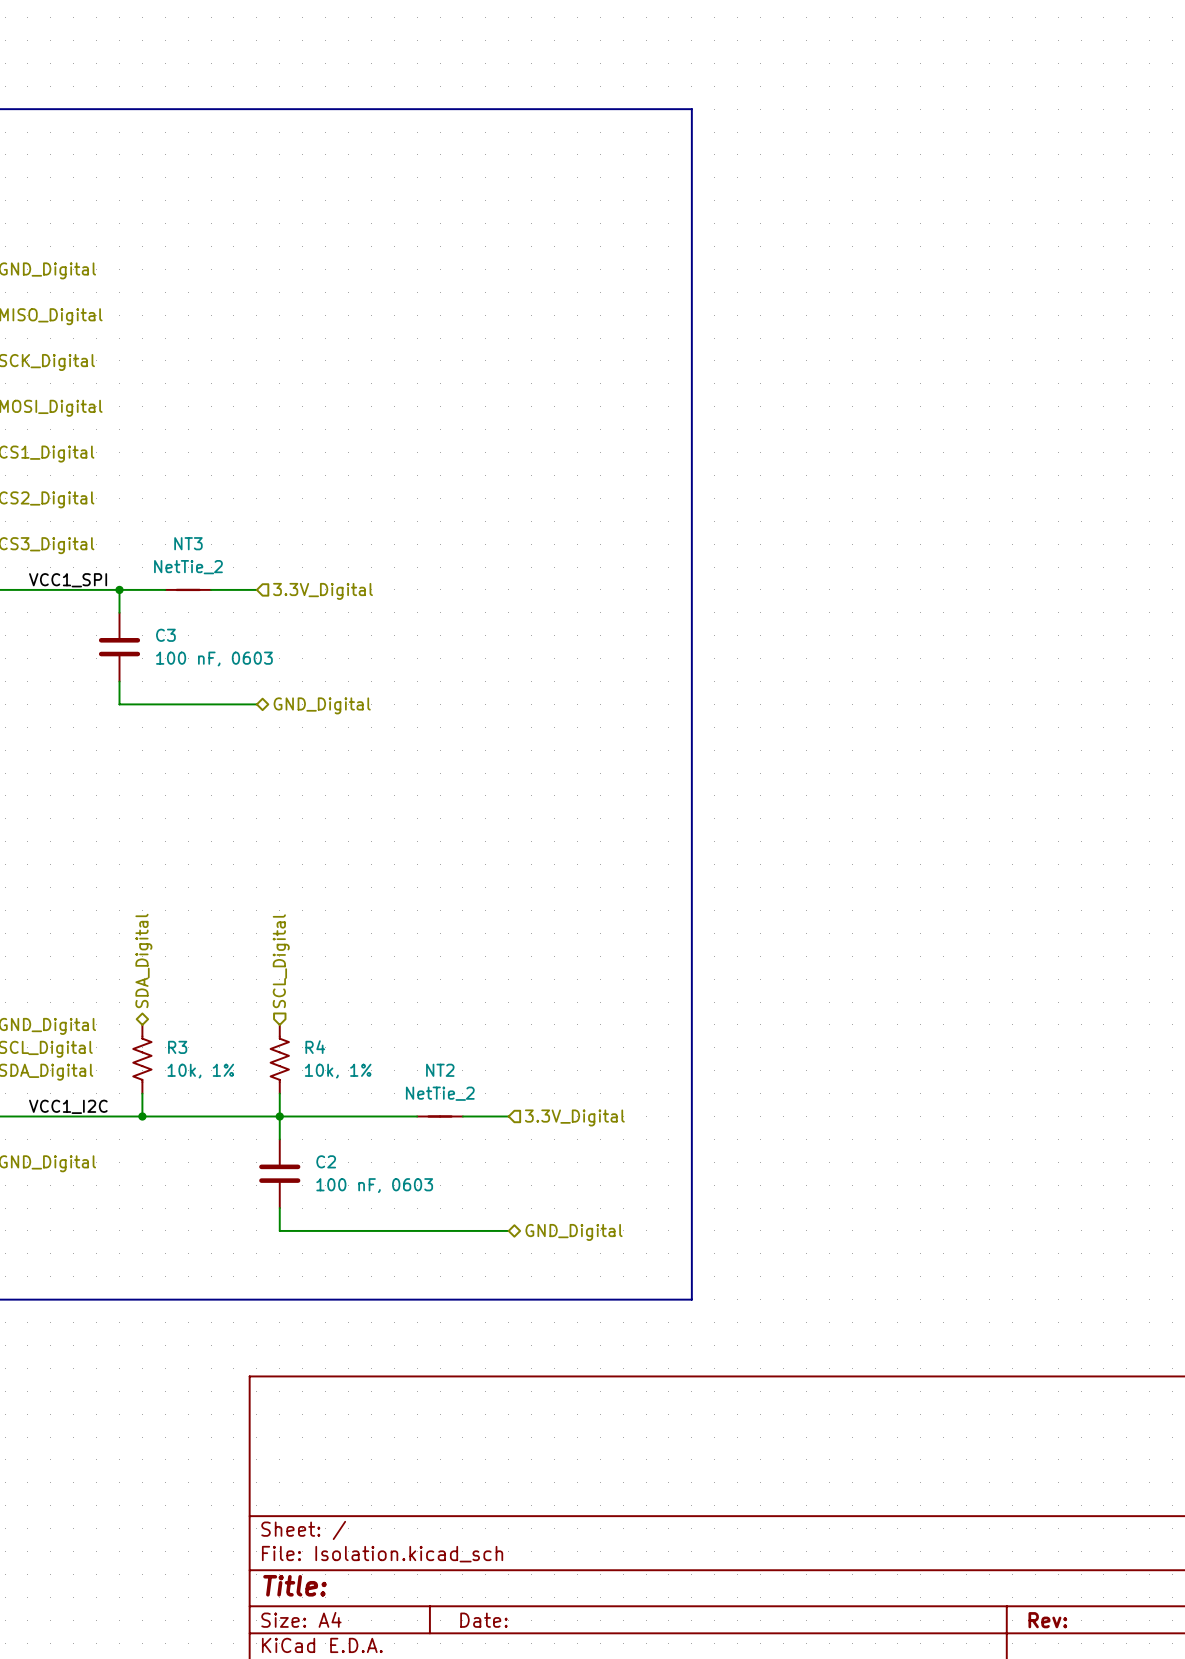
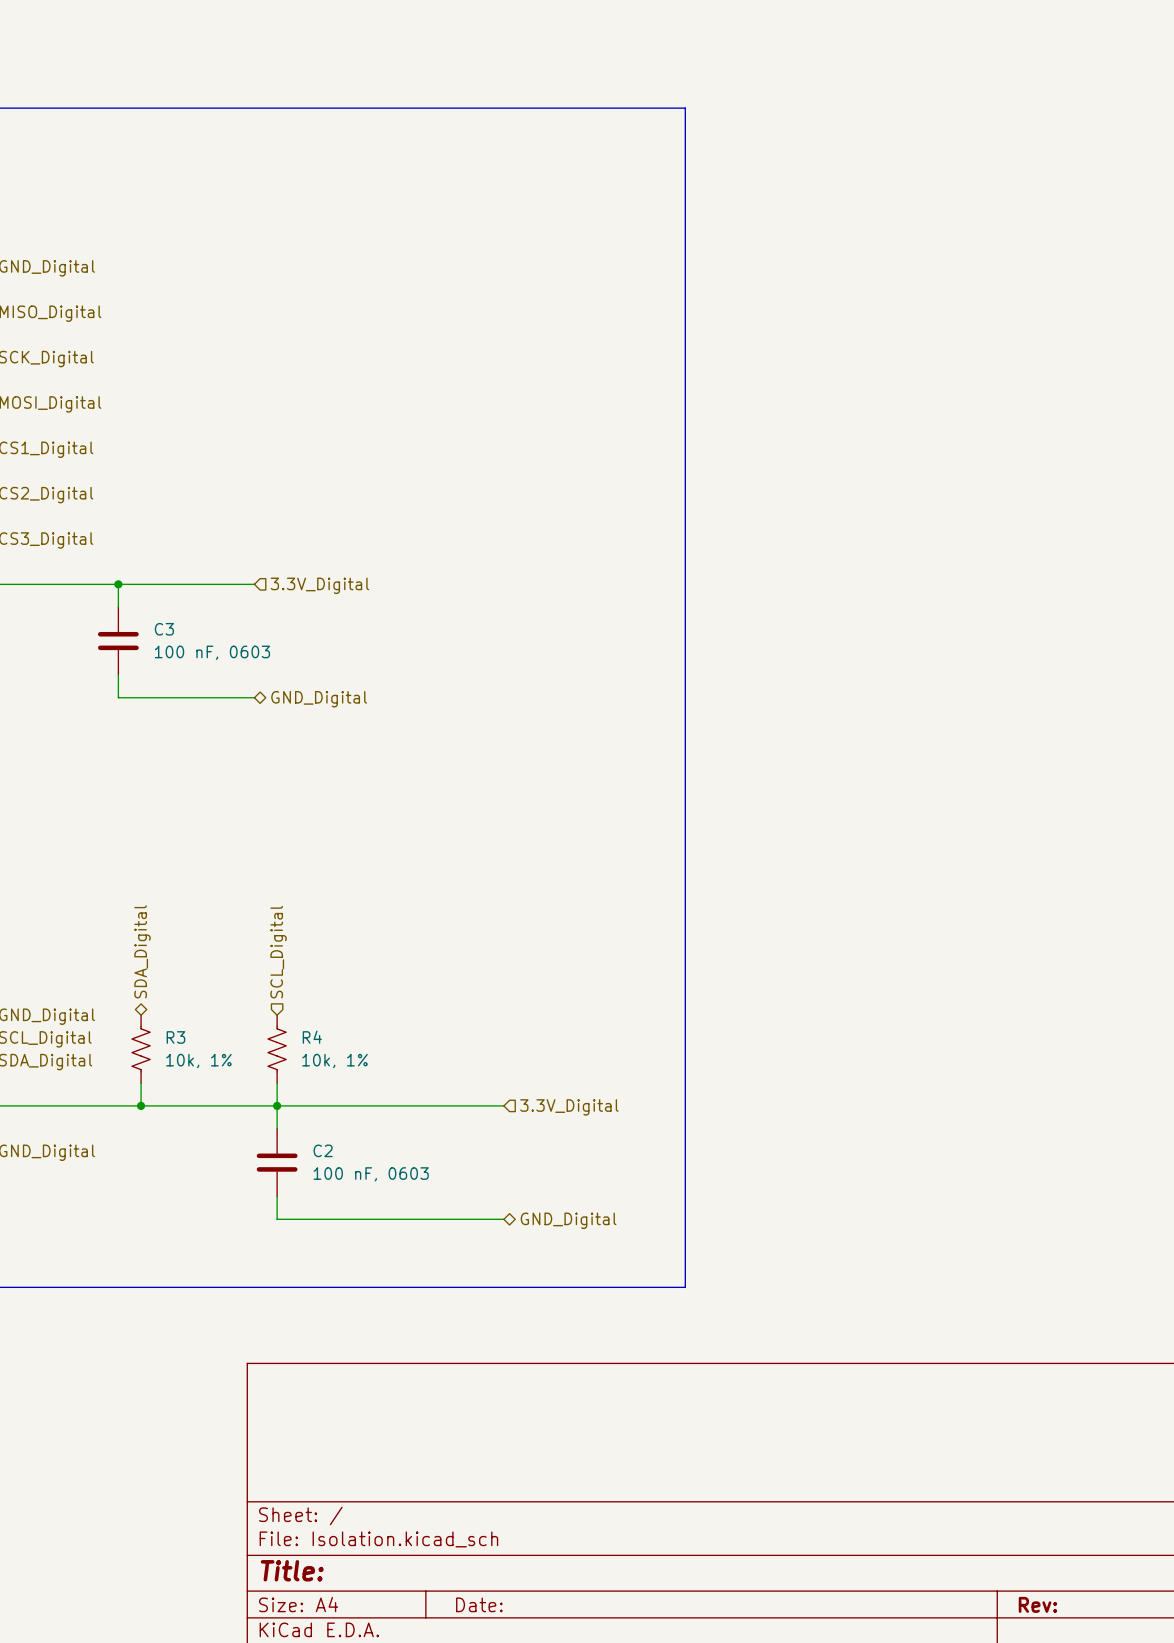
label: VCC1_SPI (68, 580) -> none
NT3: NetTie_2 (188, 589) -> none
label: VCC1_I2C (68, 1106) -> none
NT2: NetTie_2 (440, 1116) -> none

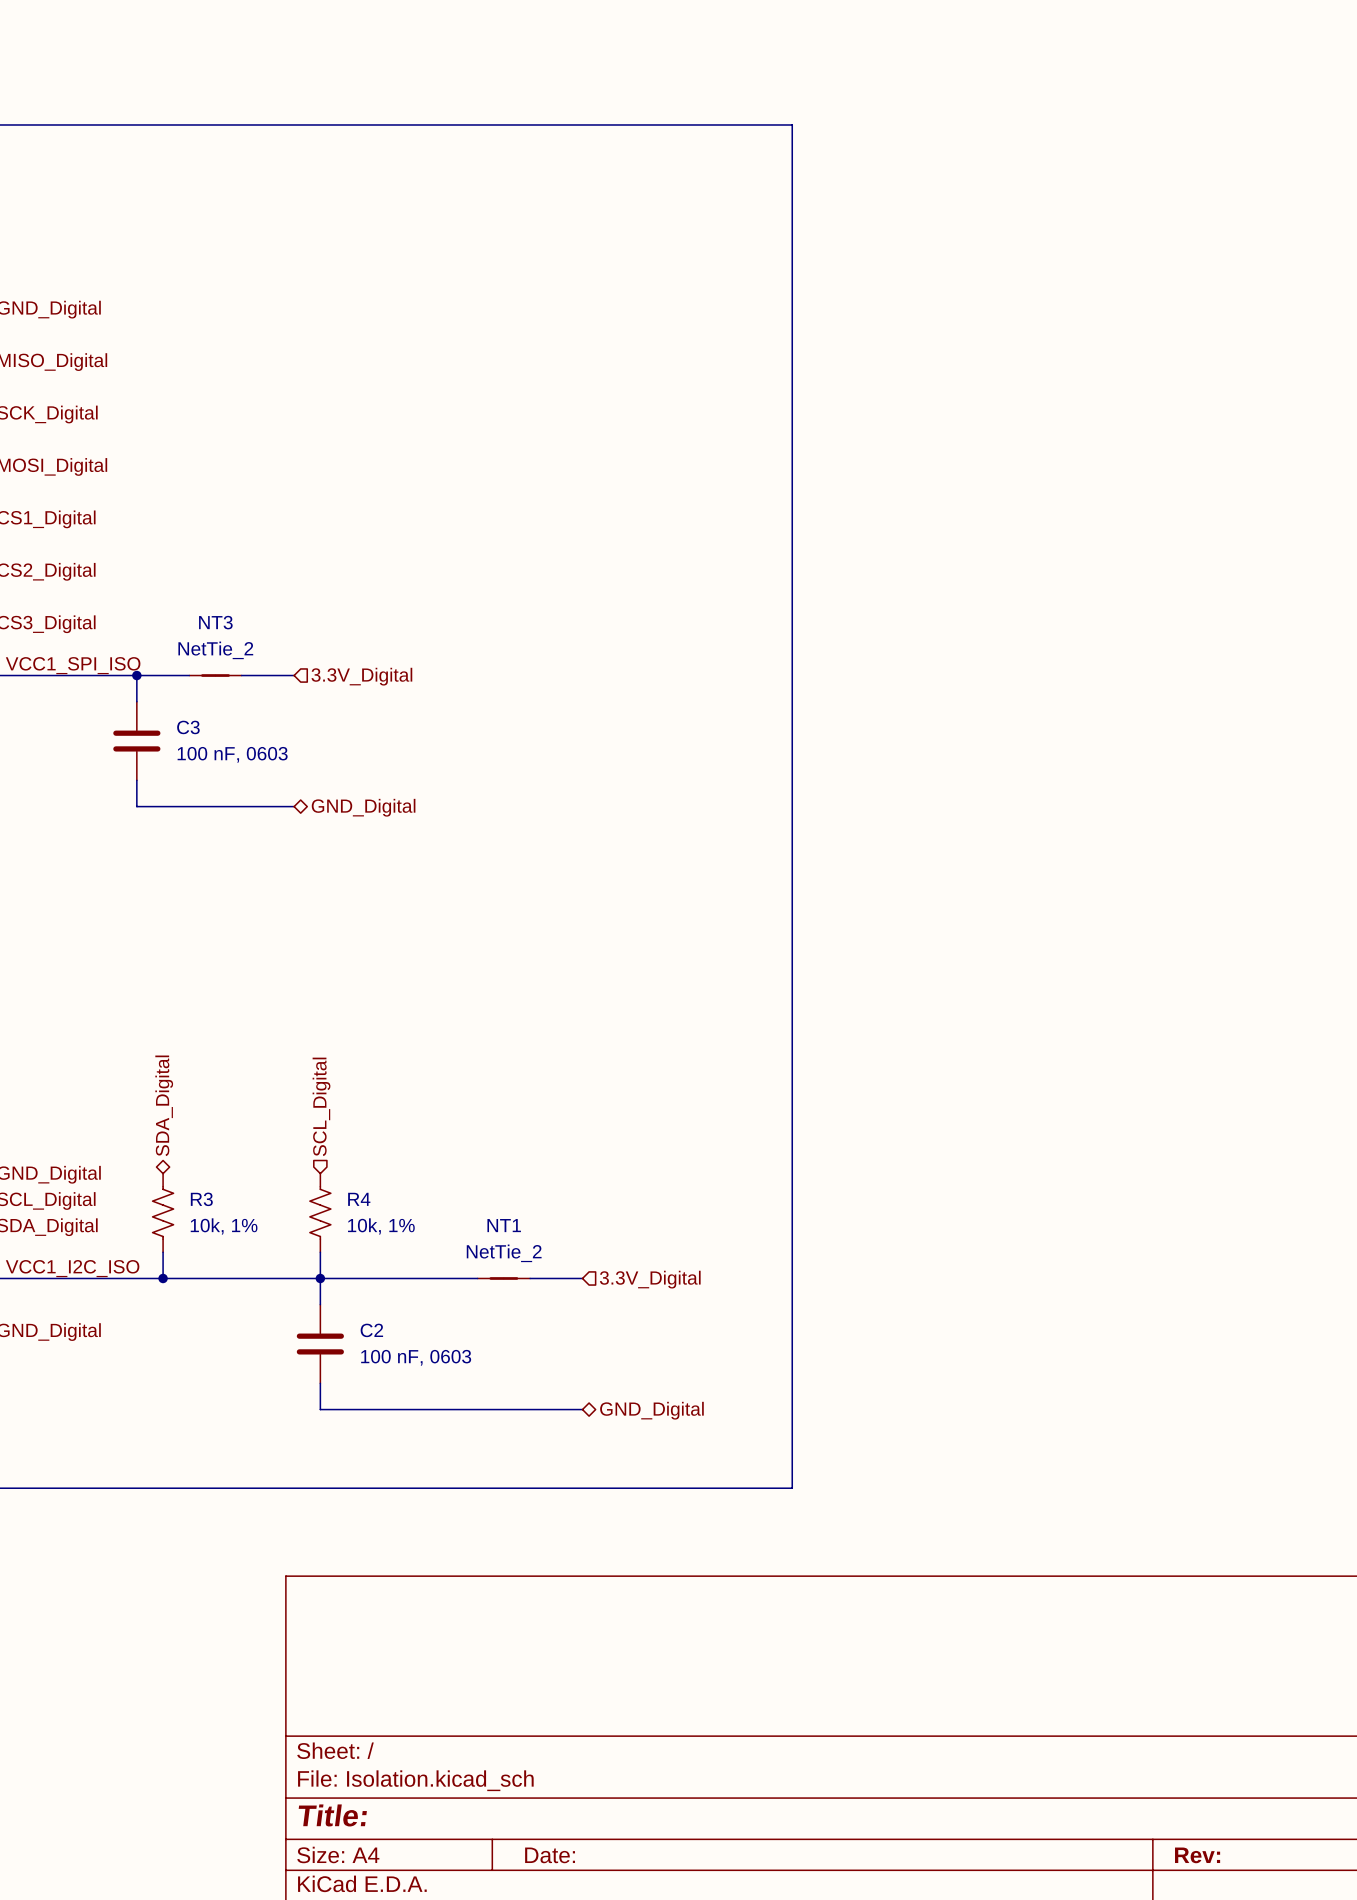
label: none -> VCC1_SPI_ISO (73, 665)
NT3: none -> NetTie_2 (215, 675)
label: none -> VCC1_I2C_ISO (72, 1268)
NT1: none -> NetTie_2 (503, 1278)

